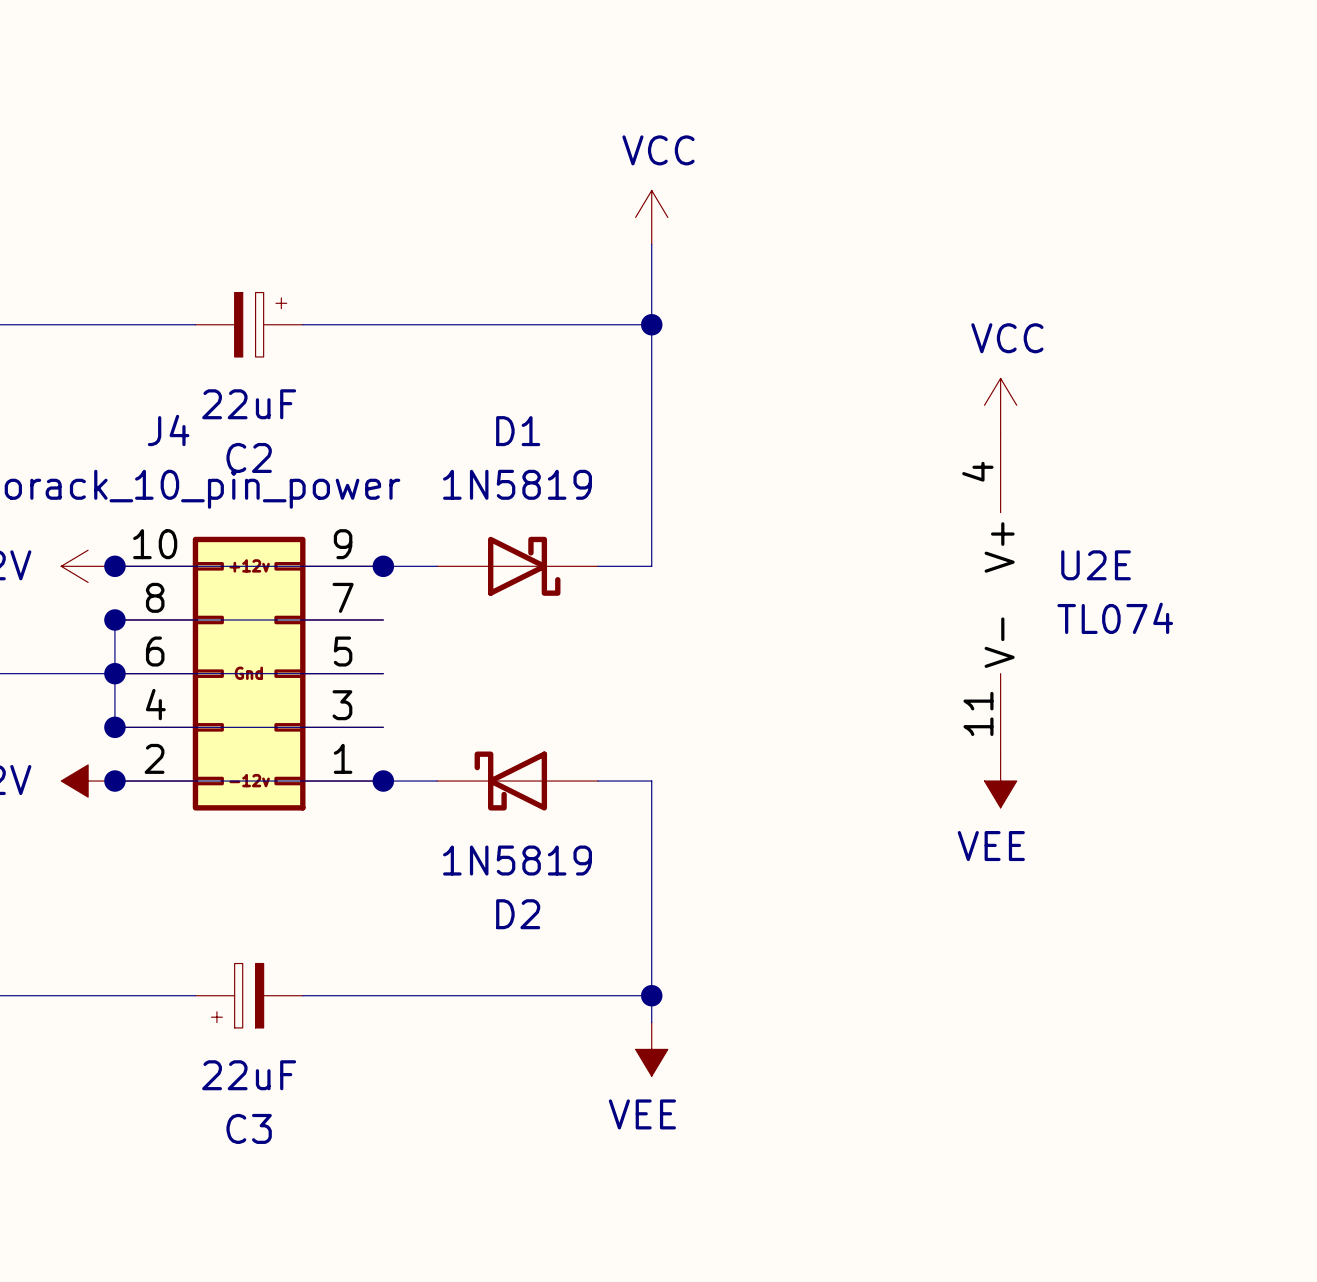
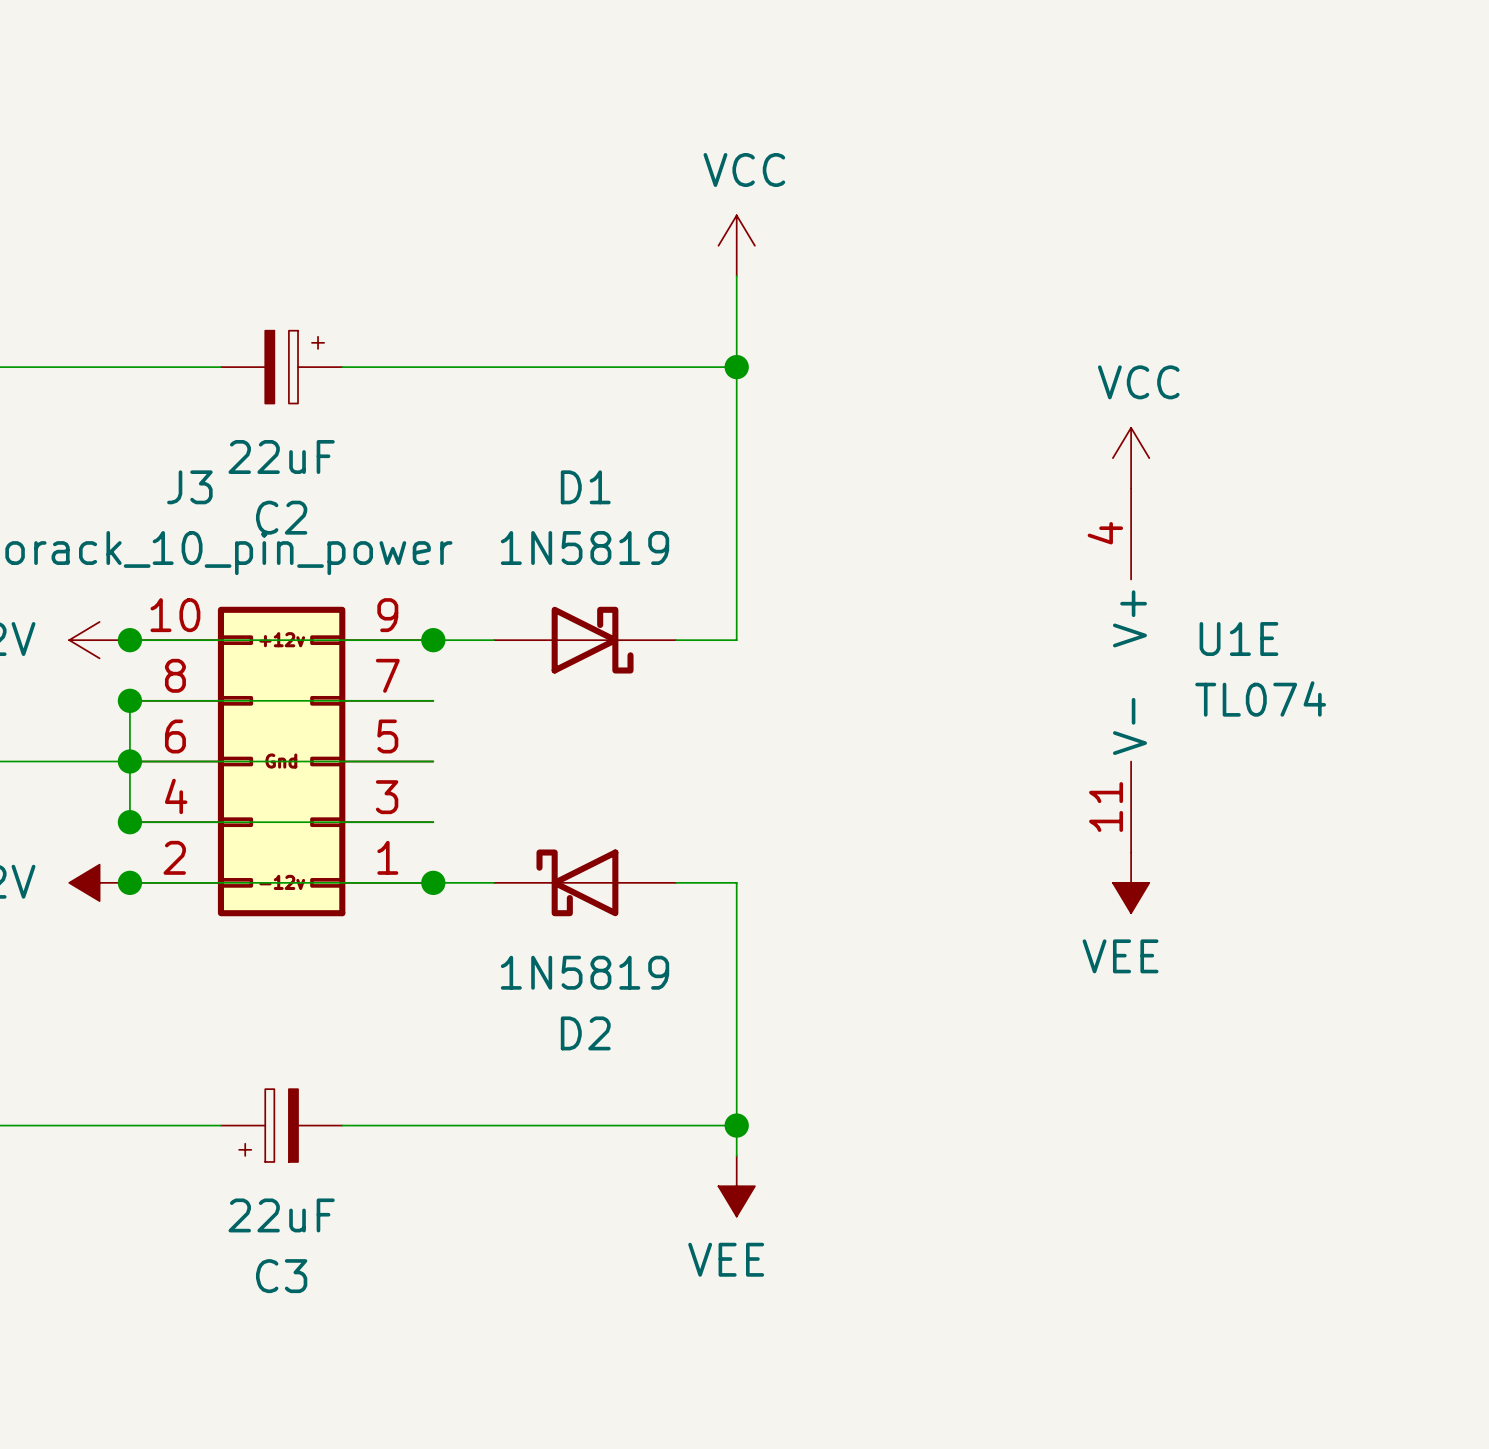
J4 name: J4 (168, 430) -> J3 (189, 487)
U2E name: U2E (1096, 565) -> U1E (1238, 639)

